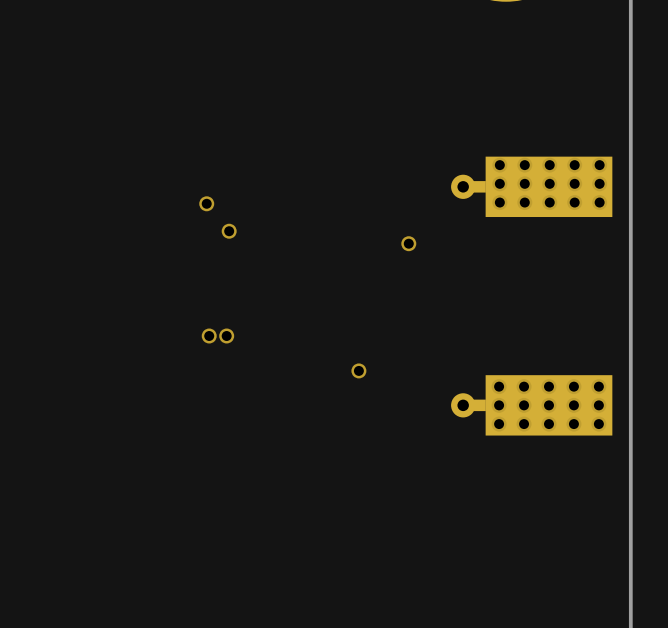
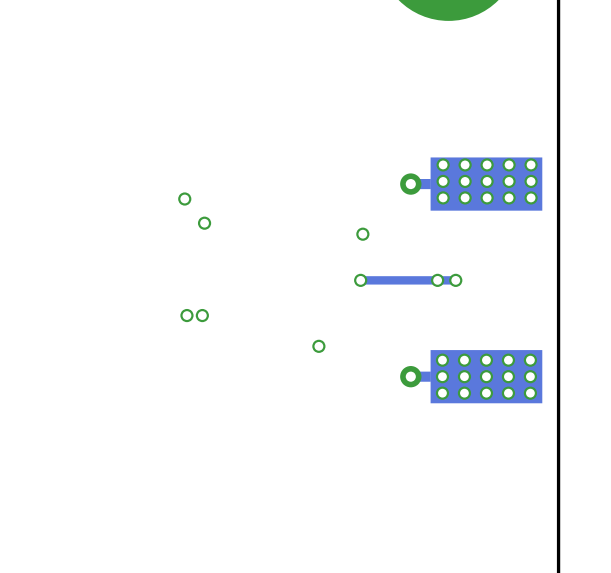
via: none -> (360, 280)
via: none -> (437, 280)
track: none -> (455, 280) (360, 280)
via: none -> (455, 280)

